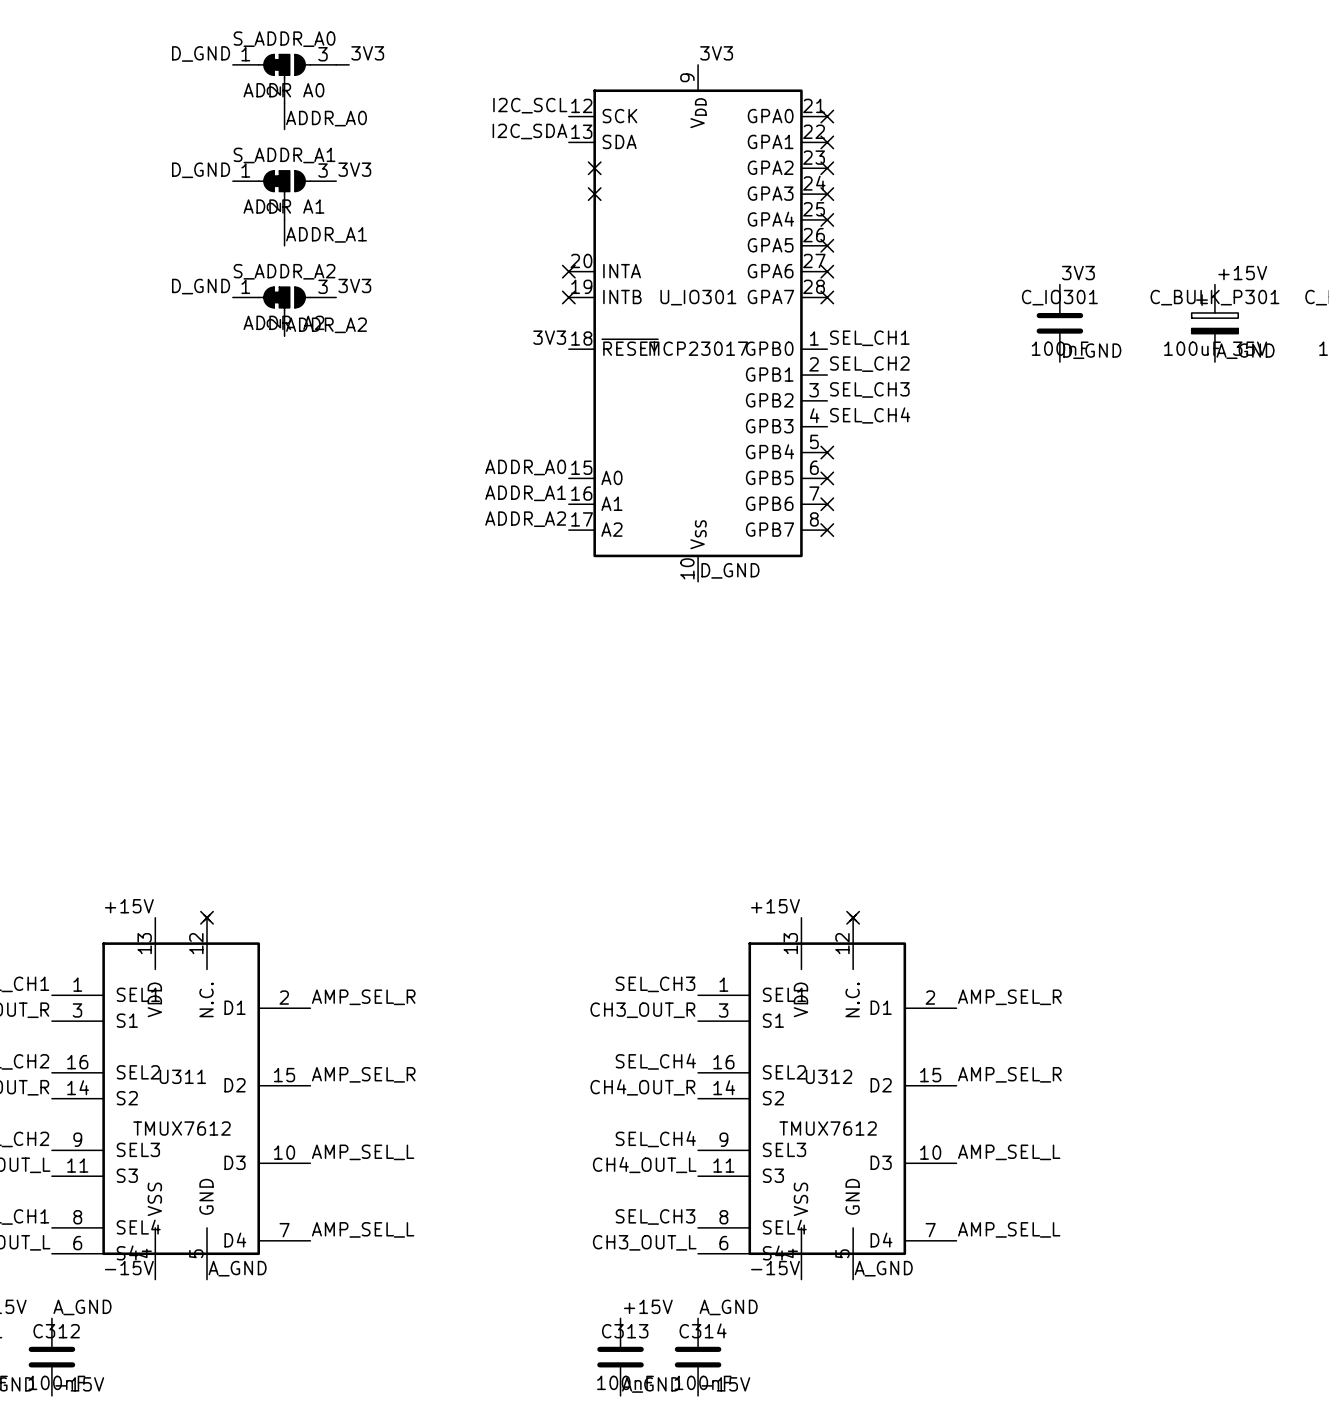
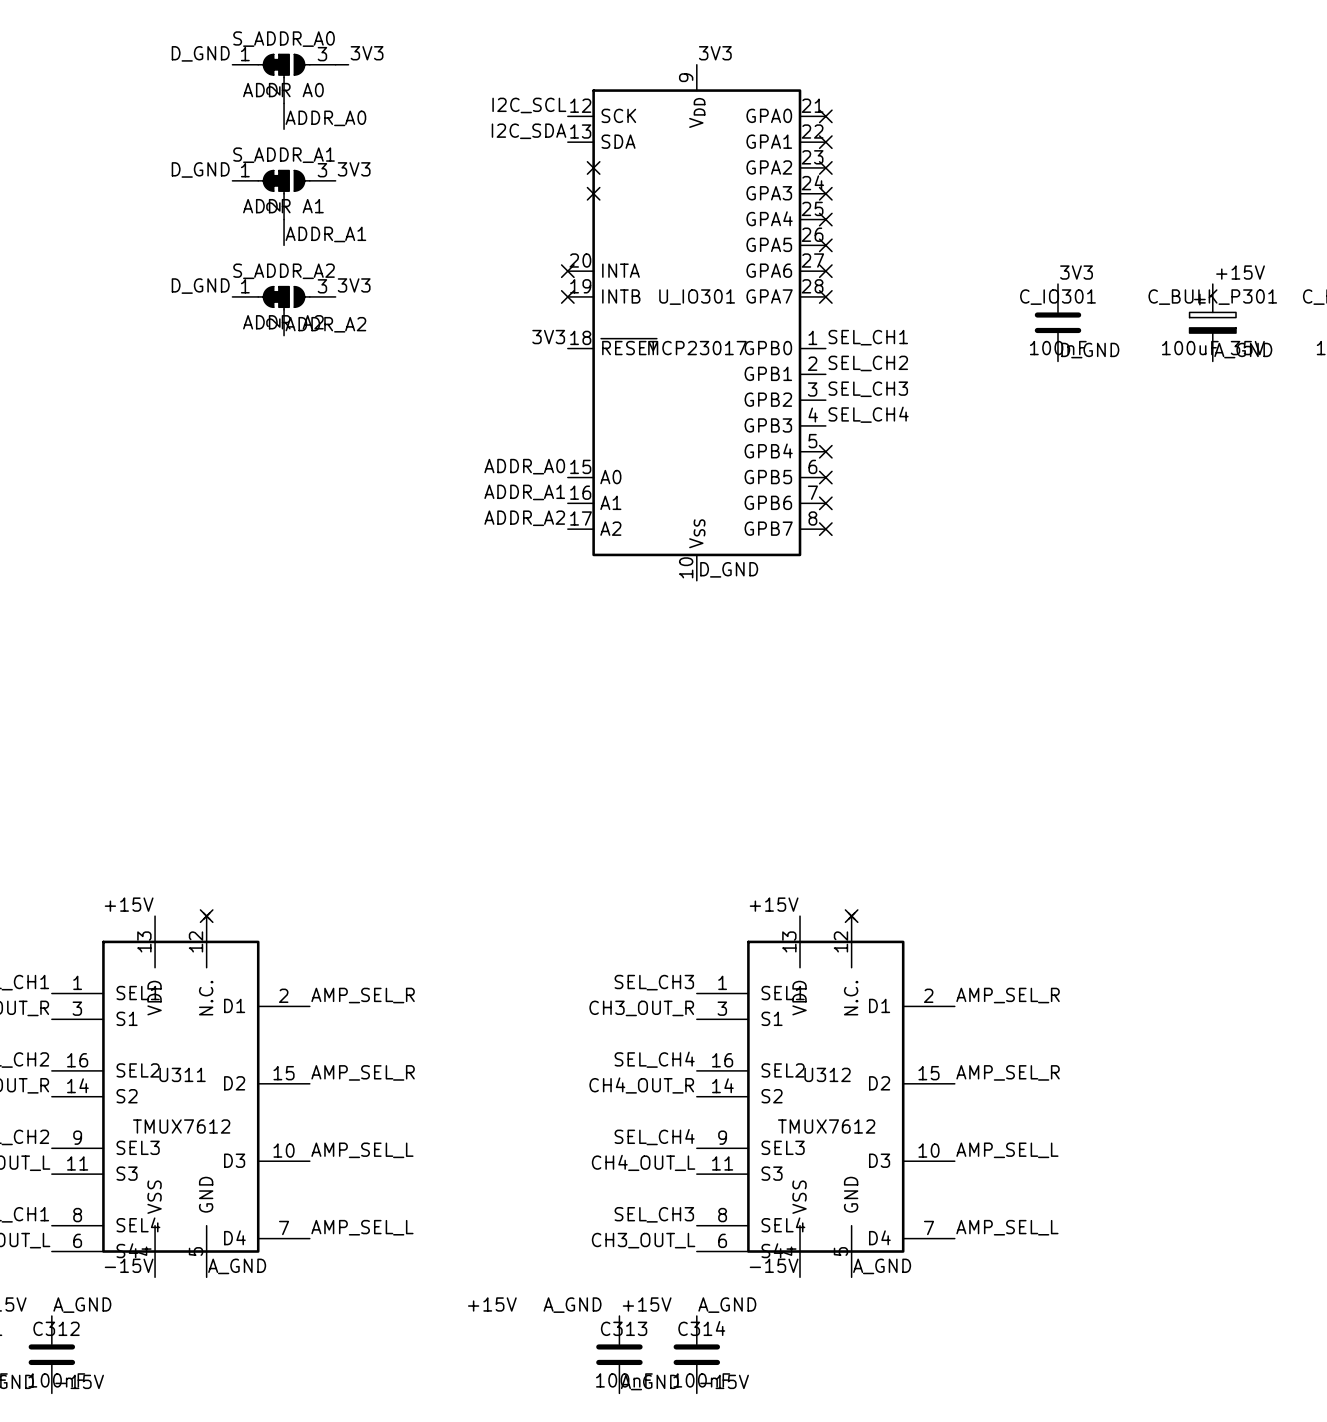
label: none -> +15V (492, 1304)
label: none -> A_GND (572, 1305)

